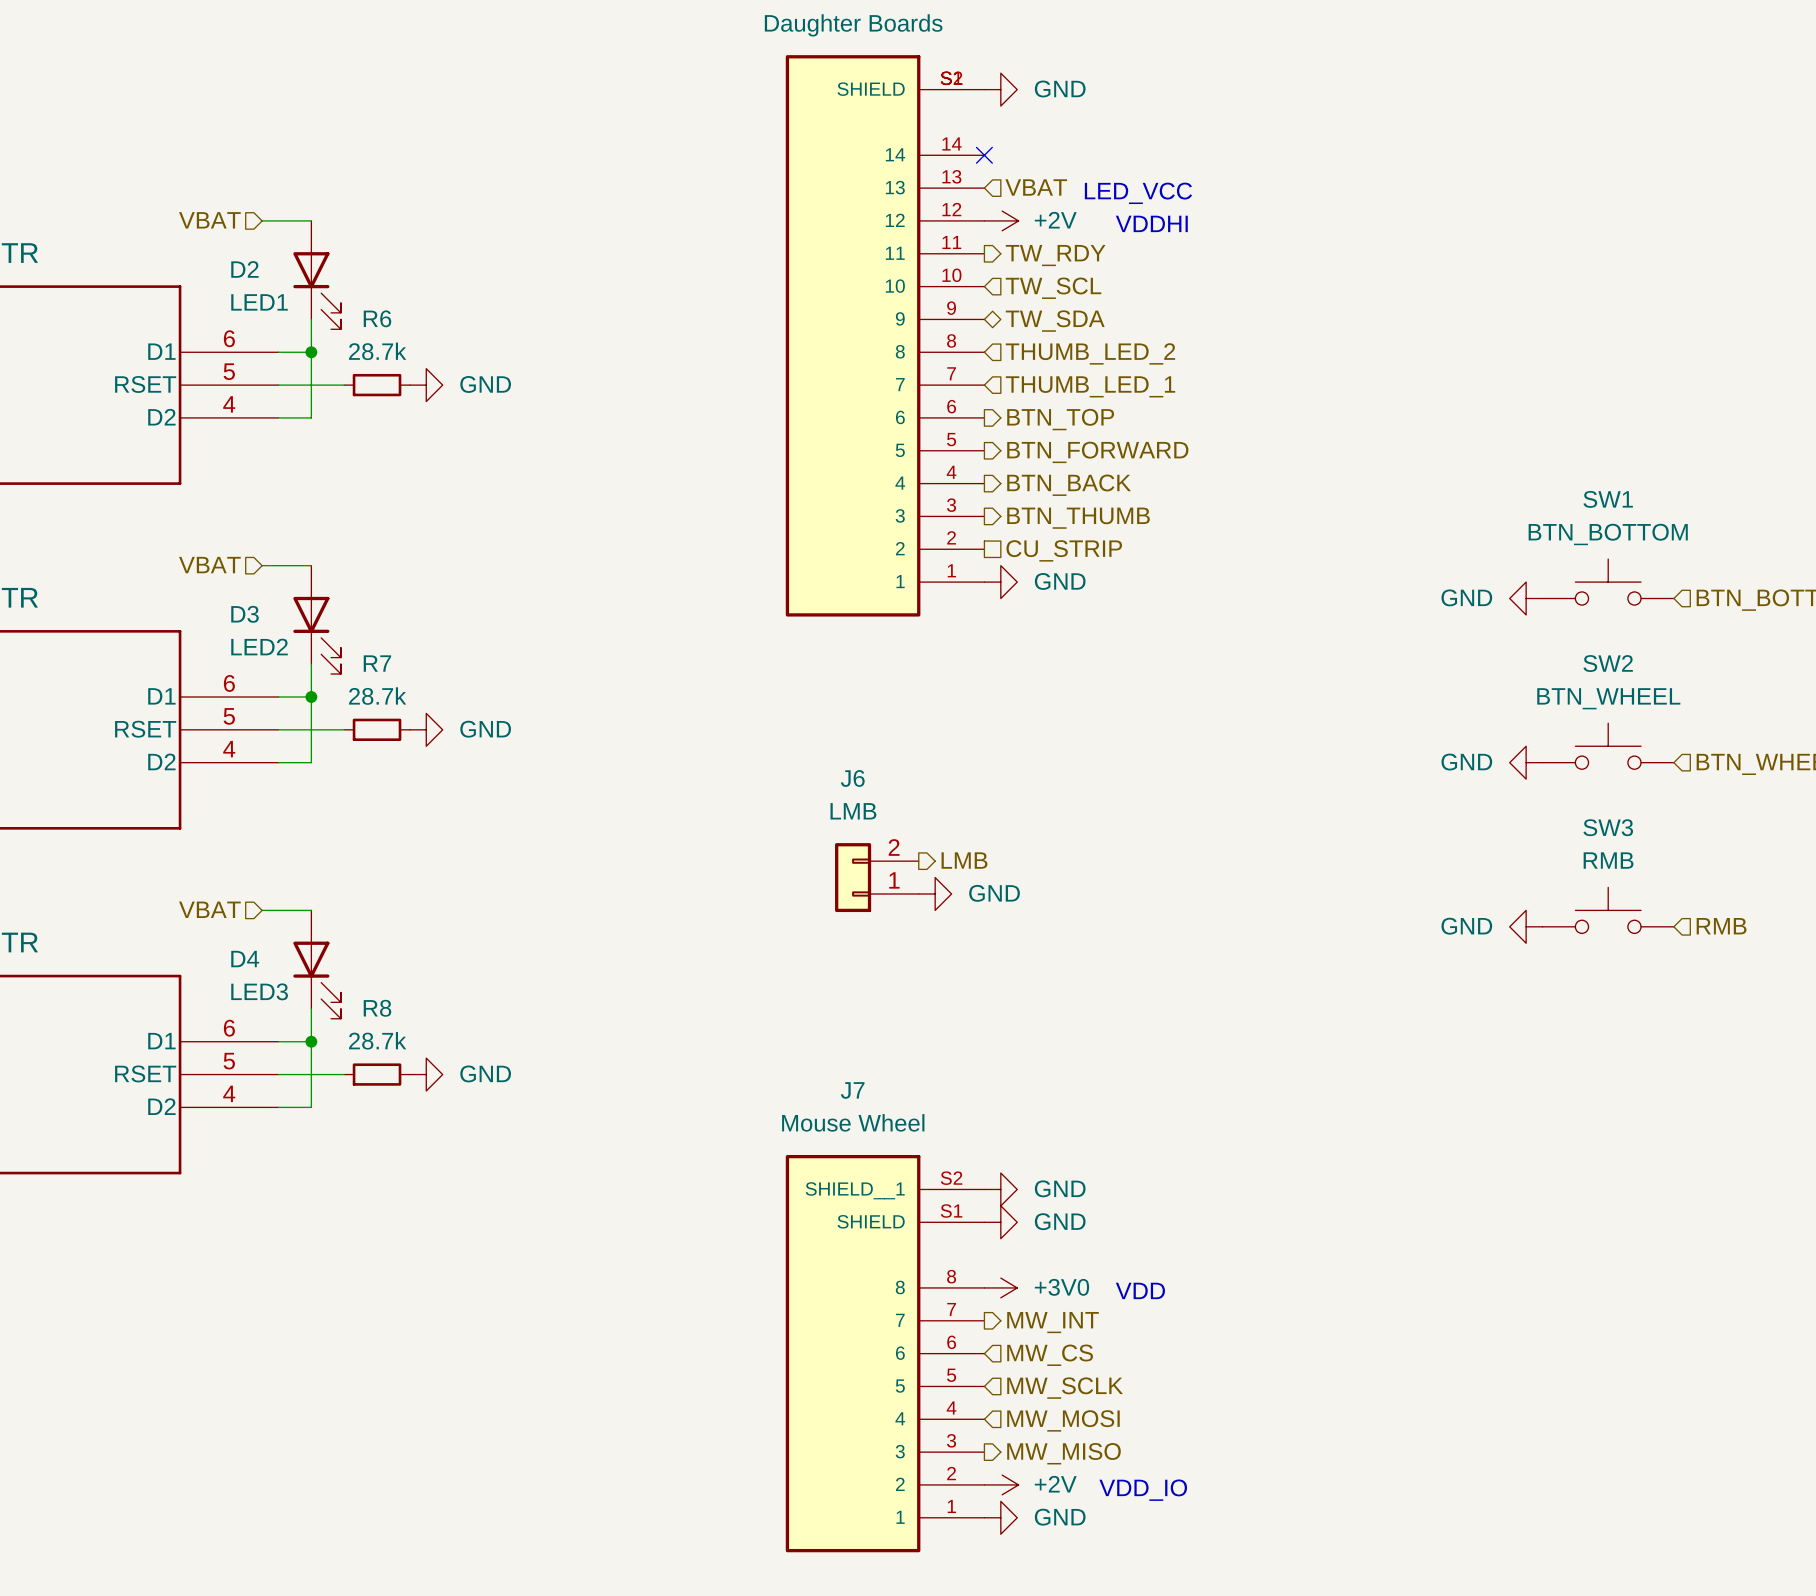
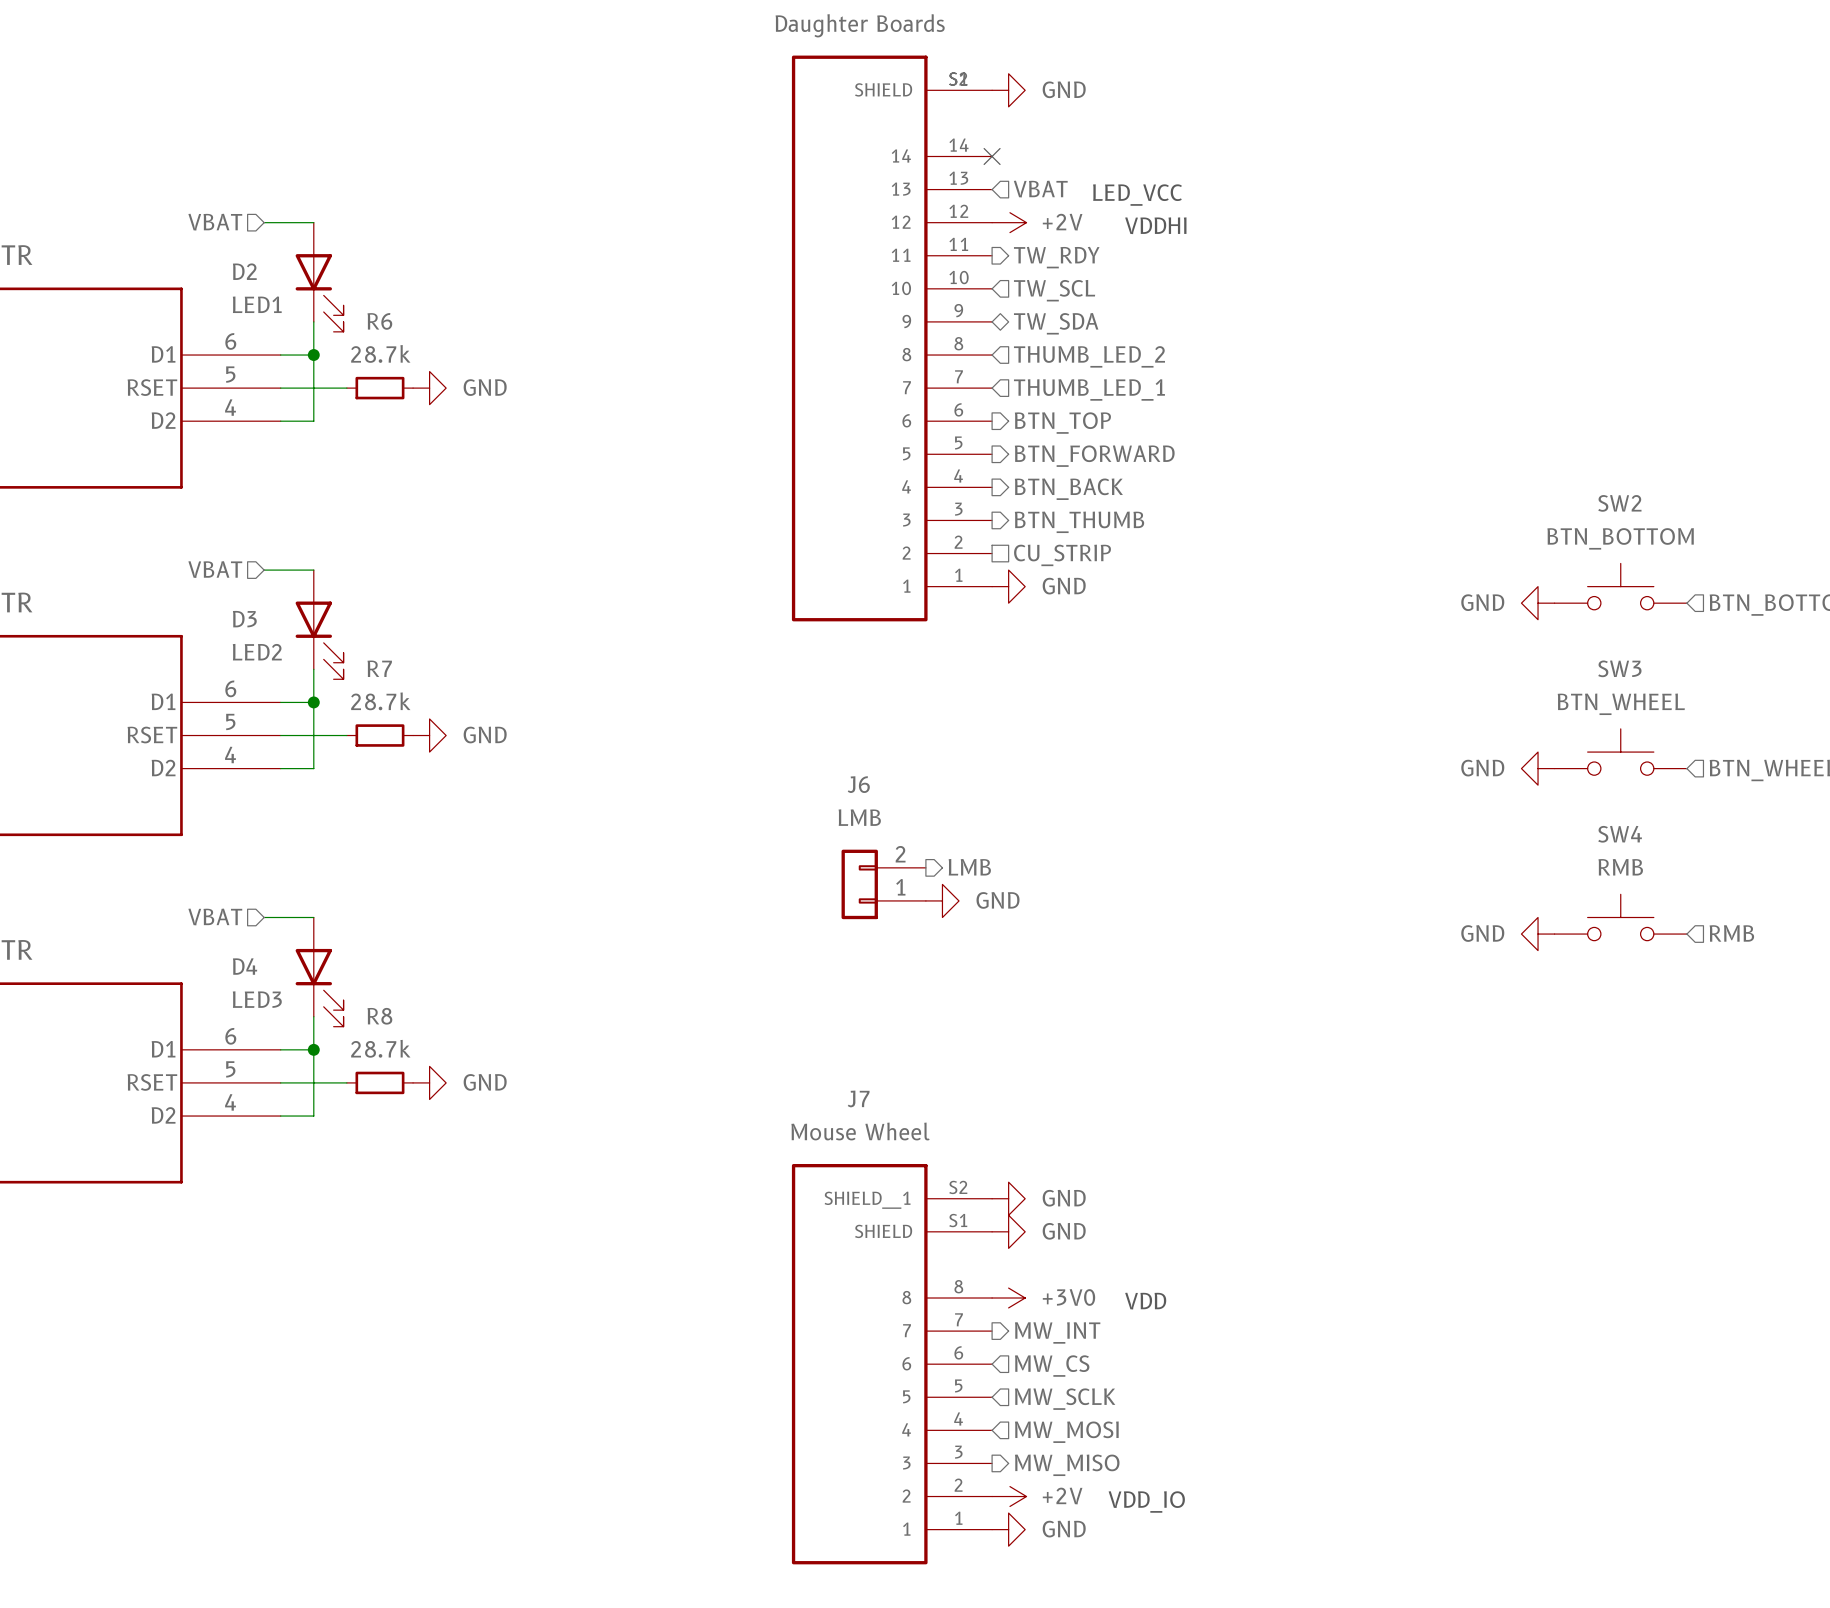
SW1 name: SW1 (1608, 499) -> SW2 (1619, 503)
SW2 name: SW2 (1608, 663) -> SW3 (1619, 668)
SW3 name: SW3 (1608, 827) -> SW4 (1620, 834)

